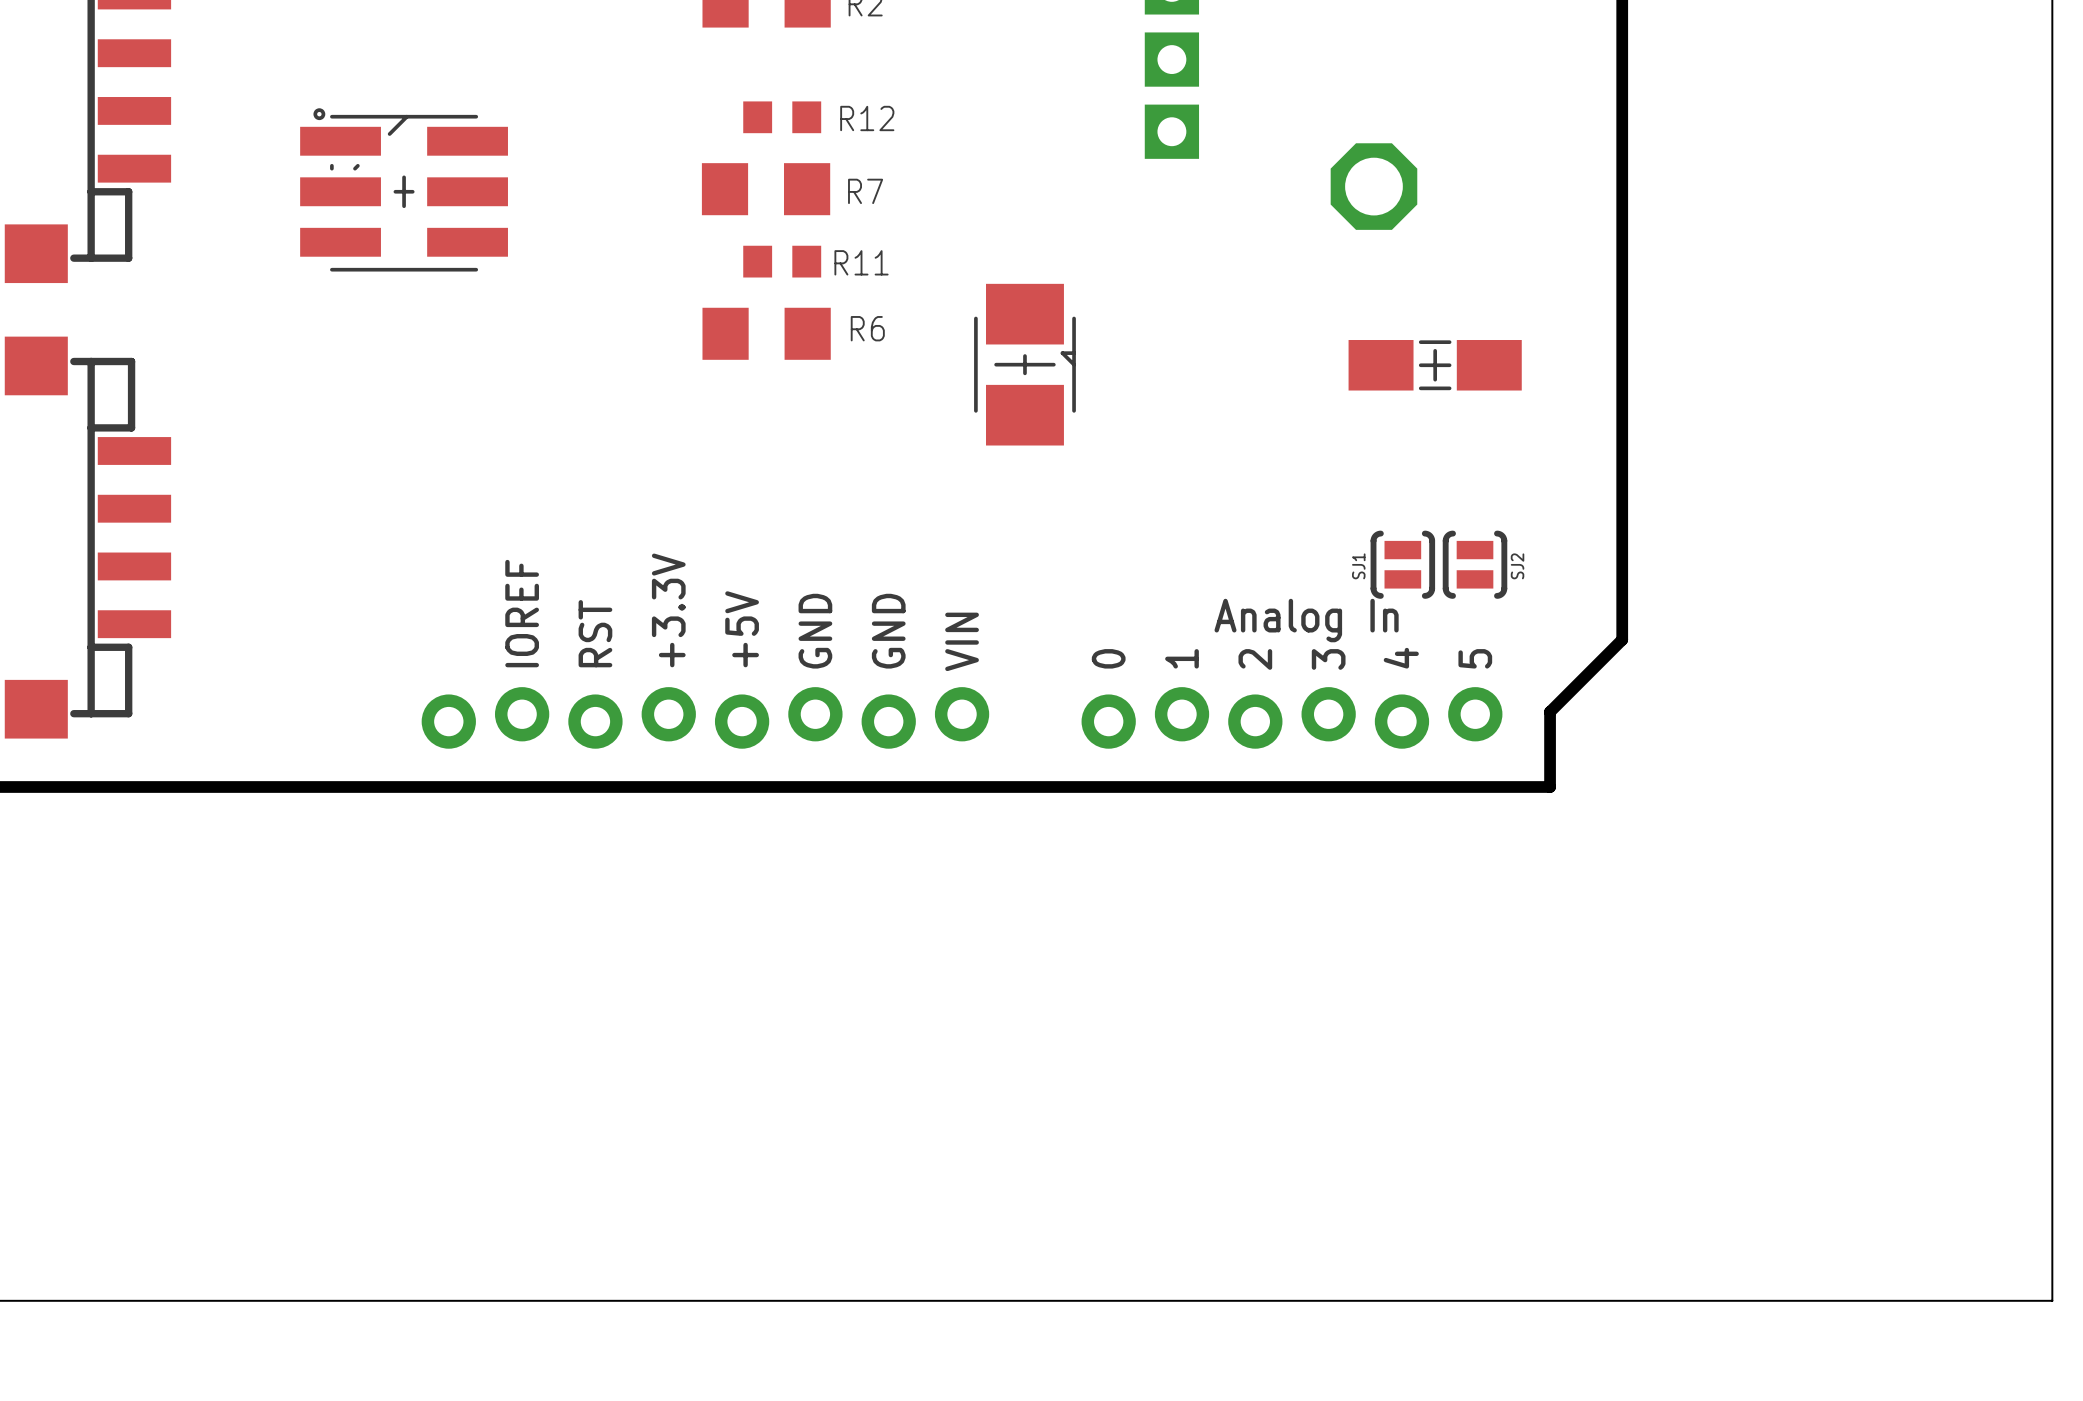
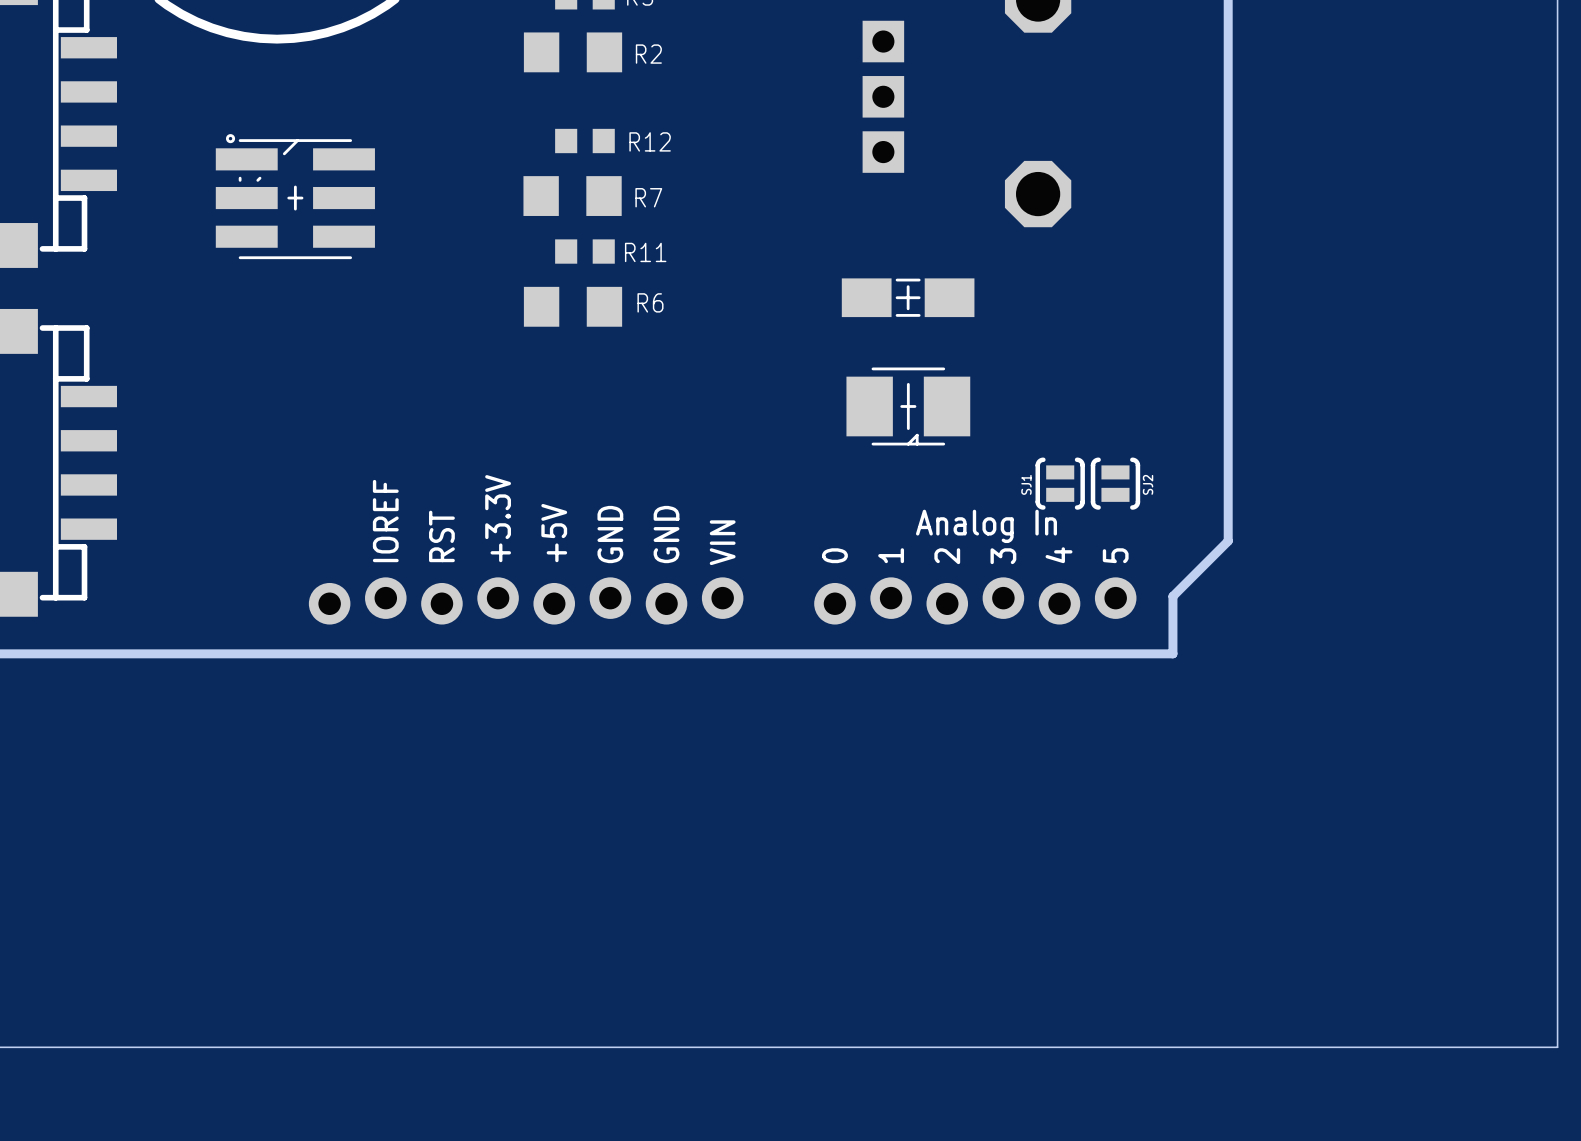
part rotation: 0° (1024, 364) -> 90° clockwise (908, 406)
part position: (1024, 364) -> (908, 406)
part position: (1435, 365) -> (908, 297)

